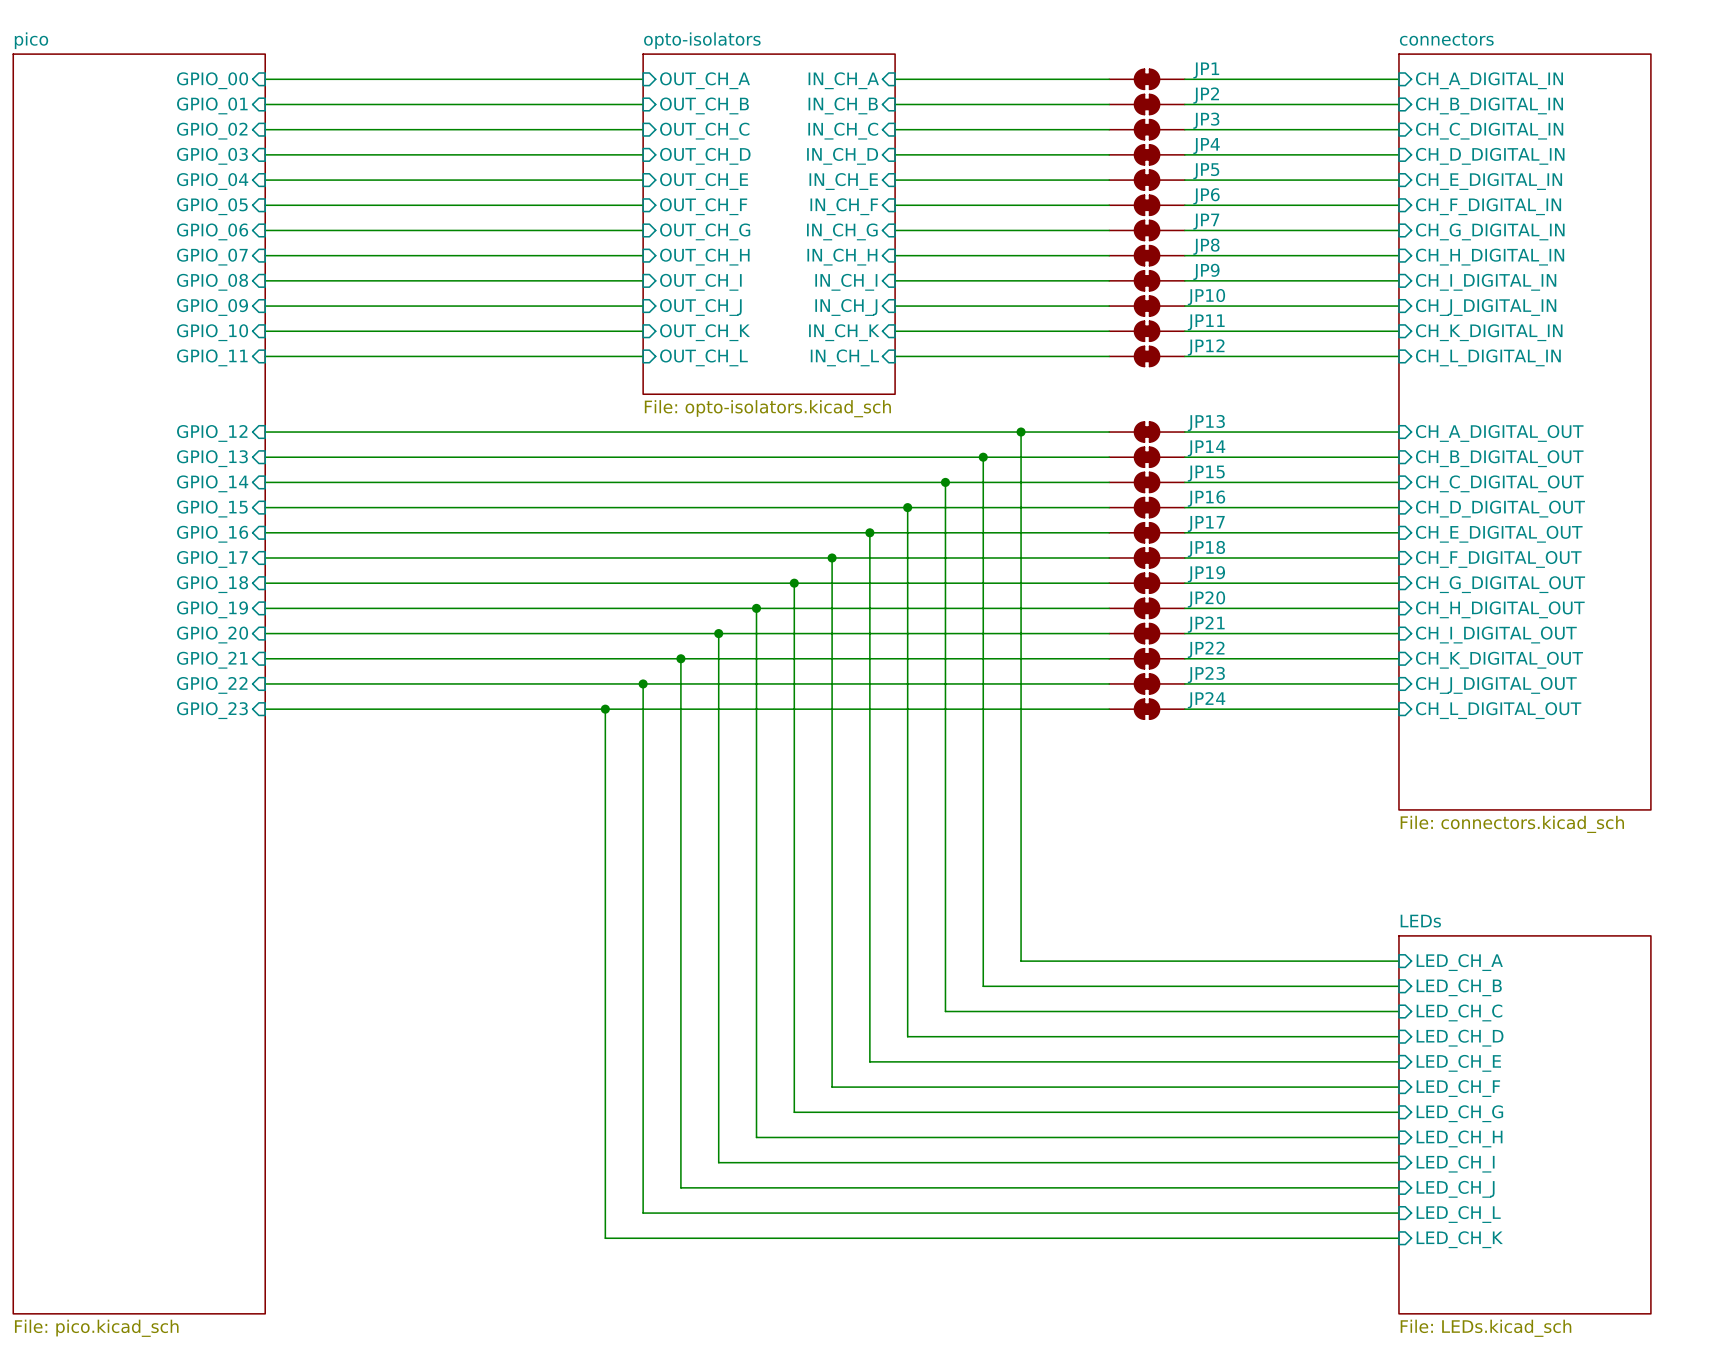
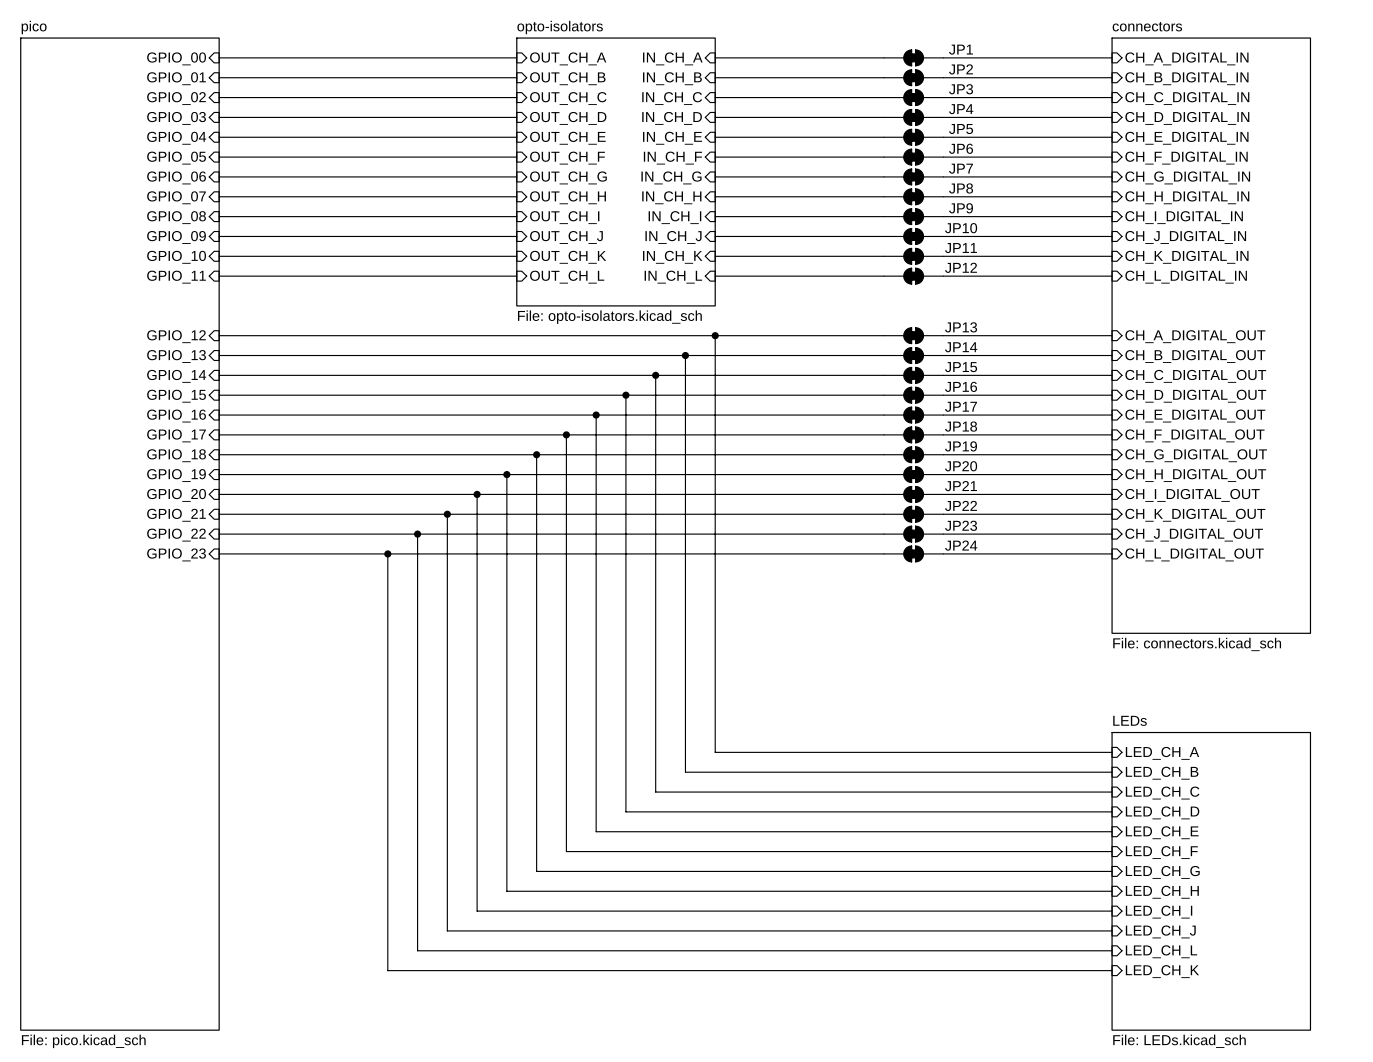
junction: none -> (715, 335)
wire: (1021, 432) (1021, 961) -> (715, 335) (715, 752) (814, 752)
junction: (1021, 432) -> none
junction: none -> (685, 355)
wire: (983, 457) (983, 986) -> (685, 355) (685, 772) (784, 772)
junction: (983, 457) -> none
junction: none -> (655, 375)
wire: (945, 482) (945, 1011) -> (655, 375) (655, 792) (754, 792)
junction: (945, 482) -> none
junction: none -> (625, 395)
wire: (907, 507) (907, 1036) -> (625, 395) (625, 811) (725, 811)
junction: (907, 507) -> none
junction: none -> (596, 415)
wire: (869, 532) (869, 1061) -> (596, 415) (596, 831) (695, 831)
junction: (869, 532) -> none
junction: none -> (566, 434)
wire: (832, 557) (832, 1087) -> (566, 434) (566, 851) (665, 851)
junction: (832, 557) -> none
junction: none -> (536, 454)
wire: (794, 583) (794, 1112) -> (536, 454) (536, 871) (635, 871)
junction: (794, 583) -> none
junction: none -> (506, 474)
wire: (756, 608) (756, 1137) -> (506, 474) (506, 891) (606, 891)
junction: (756, 608) -> none
junction: none -> (477, 494)
wire: (718, 633) (718, 1162) -> (477, 494) (477, 911) (576, 911)
junction: (718, 633) -> none
junction: none -> (447, 514)
wire: (680, 658) (680, 1187) -> (447, 514) (447, 930) (546, 930)
junction: (680, 658) -> none
junction: none -> (417, 534)
wire: (643, 683) (643, 1213) -> (417, 534) (417, 950) (516, 950)
junction: (643, 683) -> none
junction: none -> (387, 553)
wire: (605, 709) (605, 1238) -> (387, 553) (387, 970) (487, 970)
junction: (605, 709) -> none

